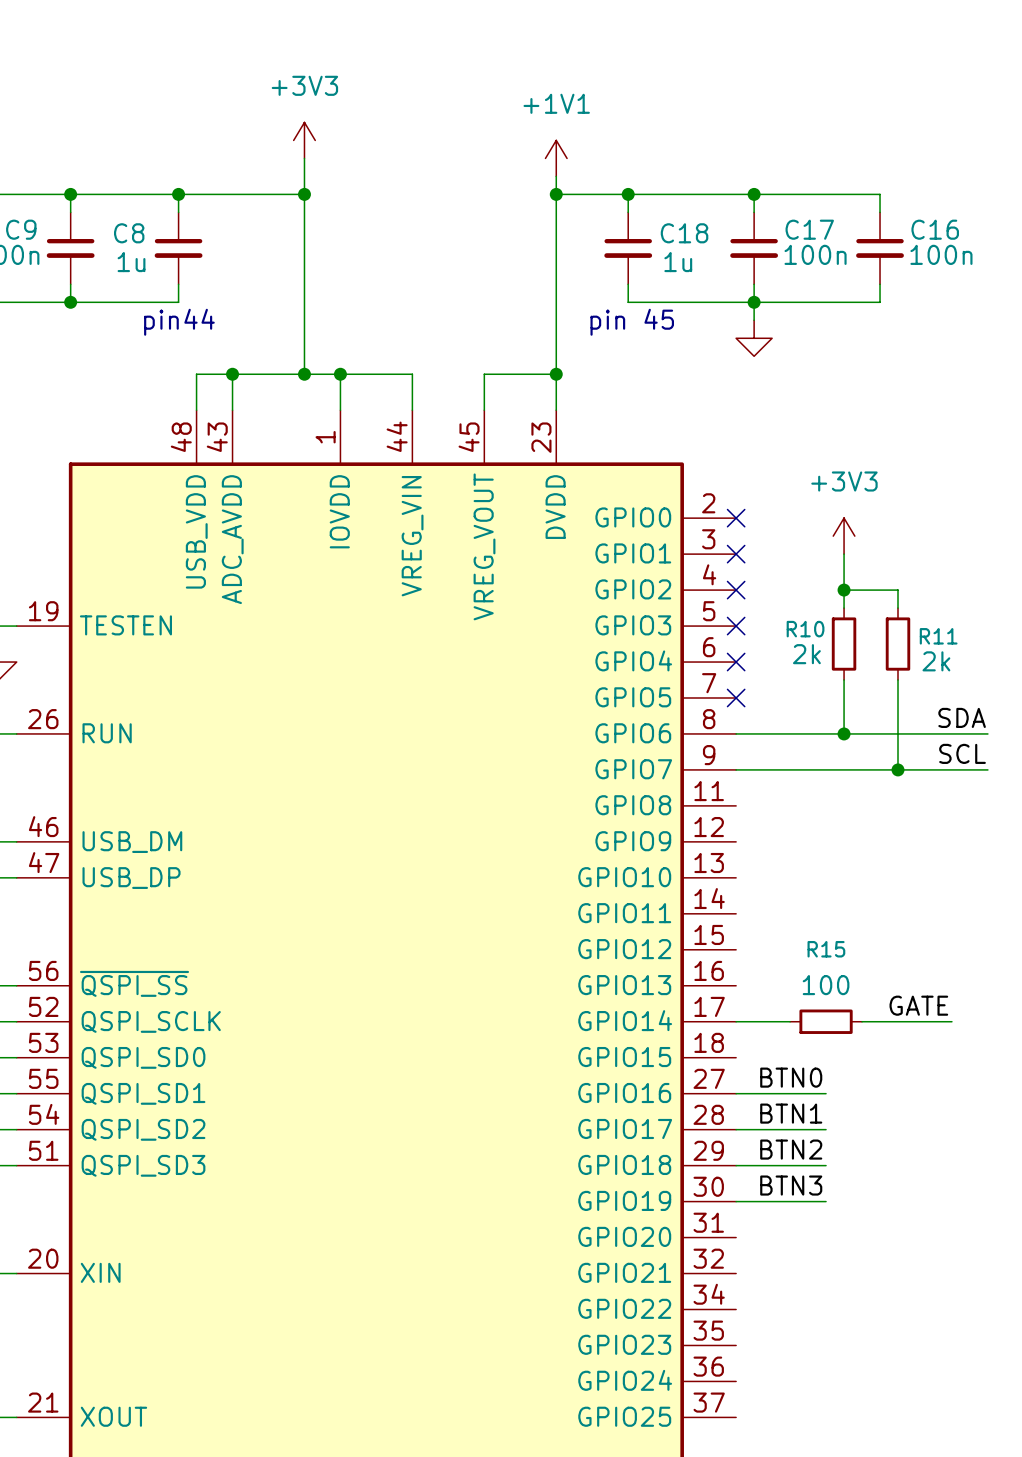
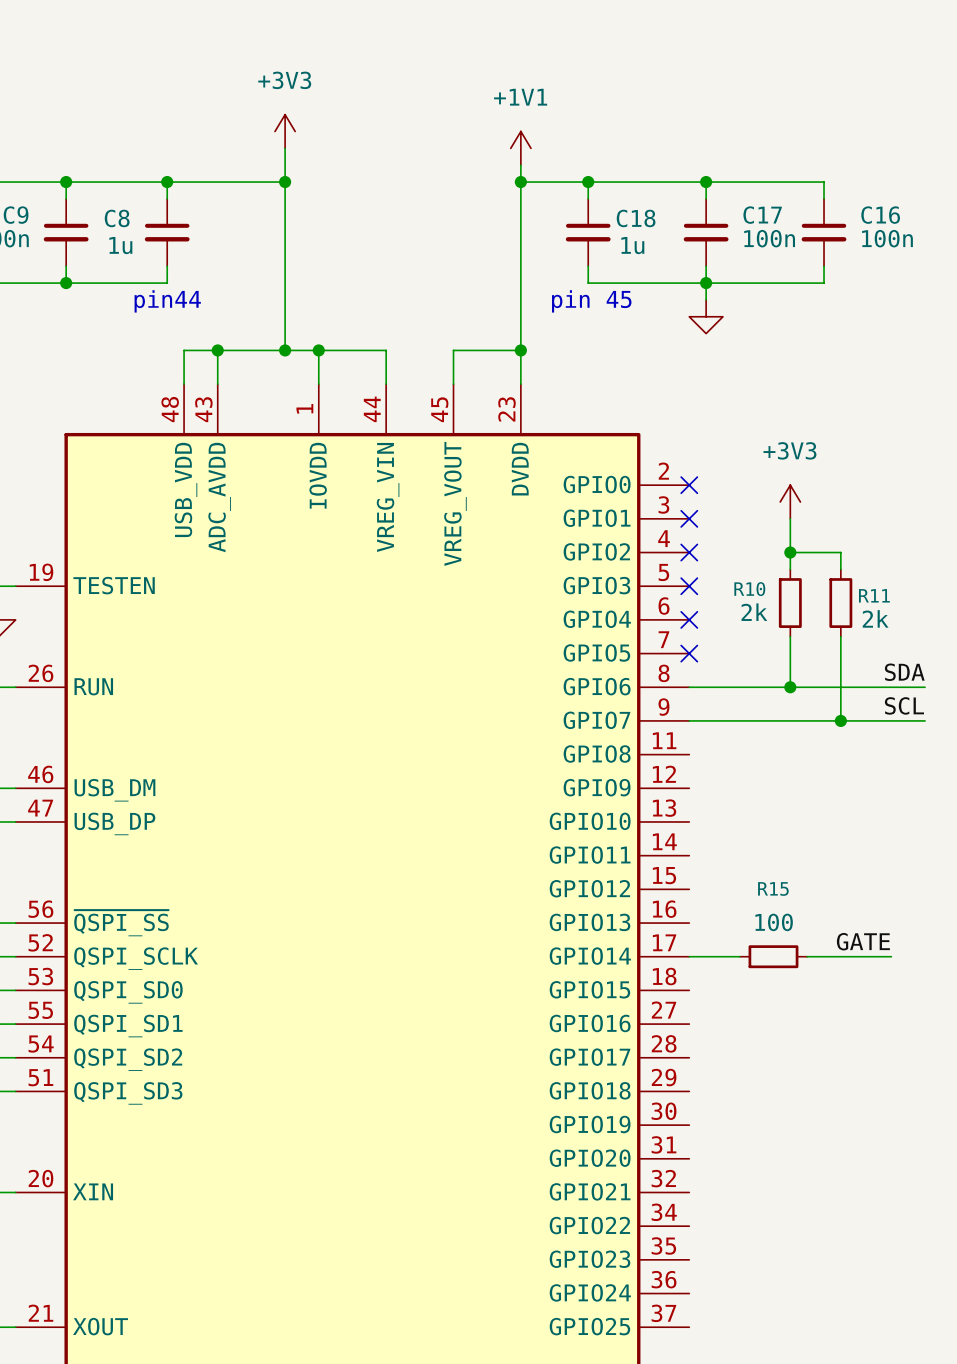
label: BTN0 (791, 1077) -> none
wire: (736, 1093) (826, 1093) -> none
label: BTN1 (791, 1113) -> none
wire: (736, 1129) (826, 1129) -> none
label: BTN2 (791, 1149) -> none
wire: (736, 1165) (826, 1165) -> none
label: BTN3 (791, 1185) -> none
wire: (736, 1201) (826, 1201) -> none

